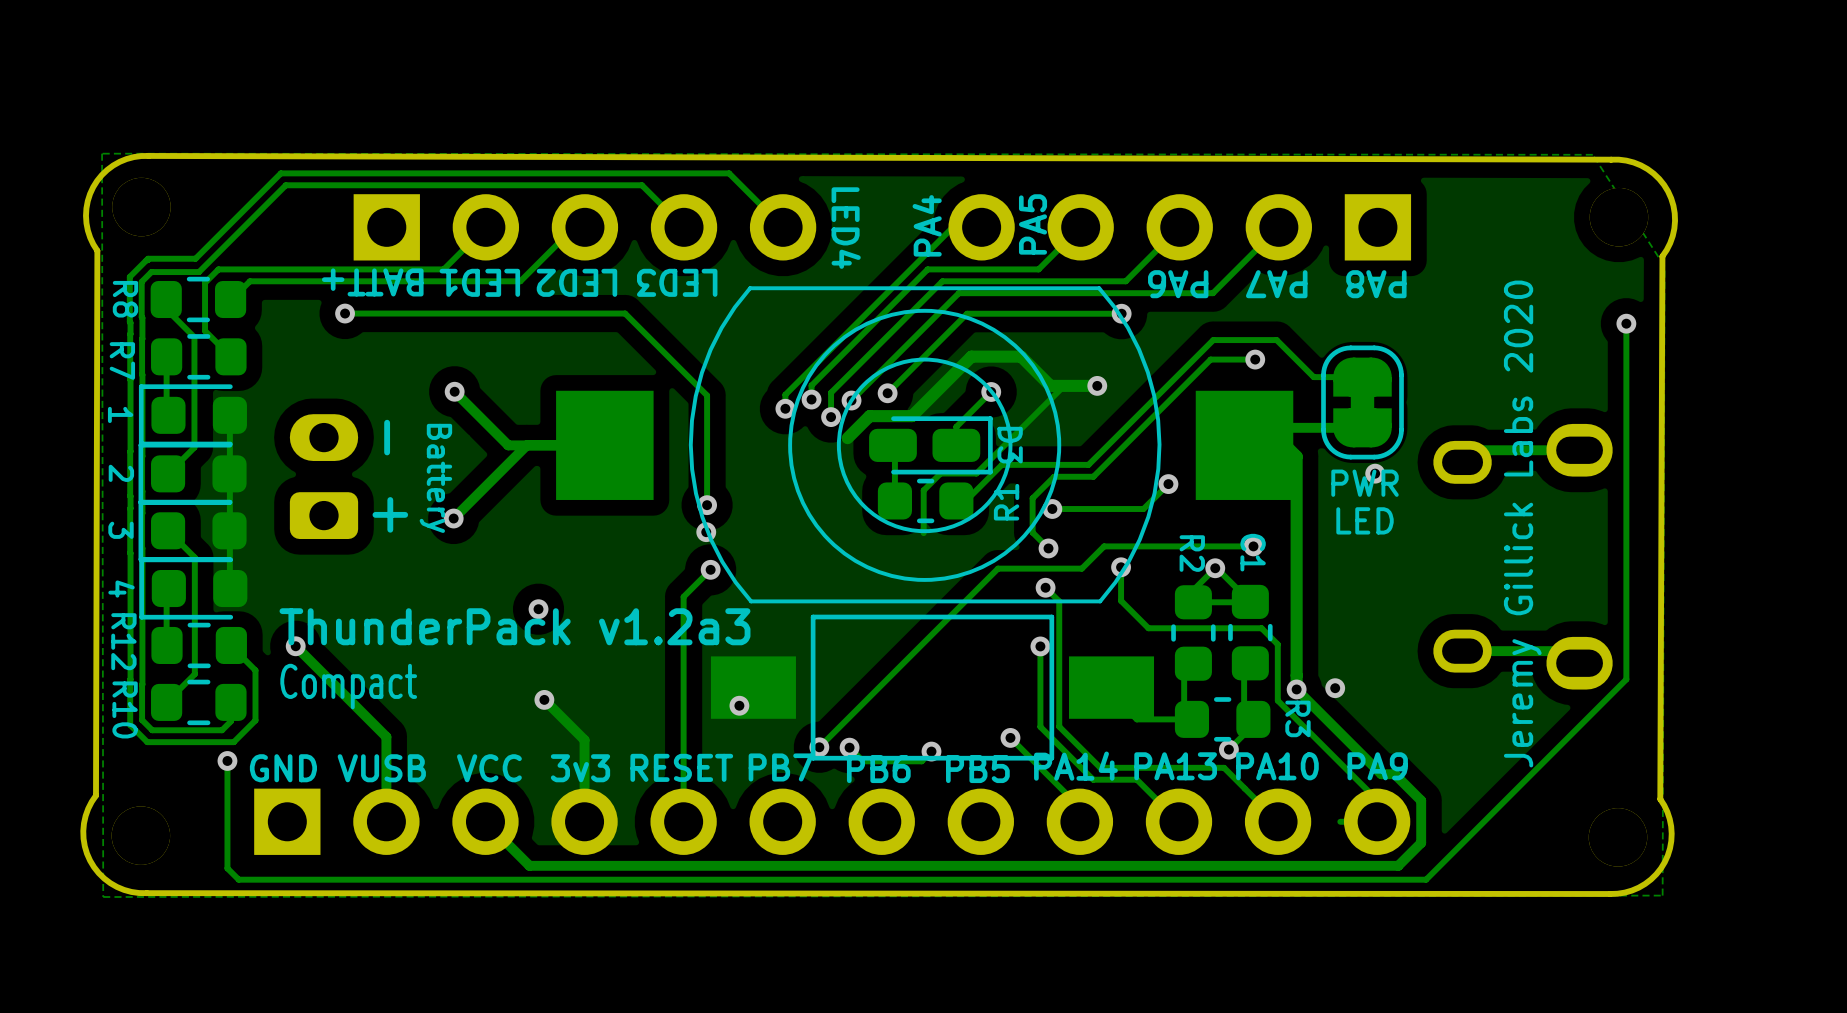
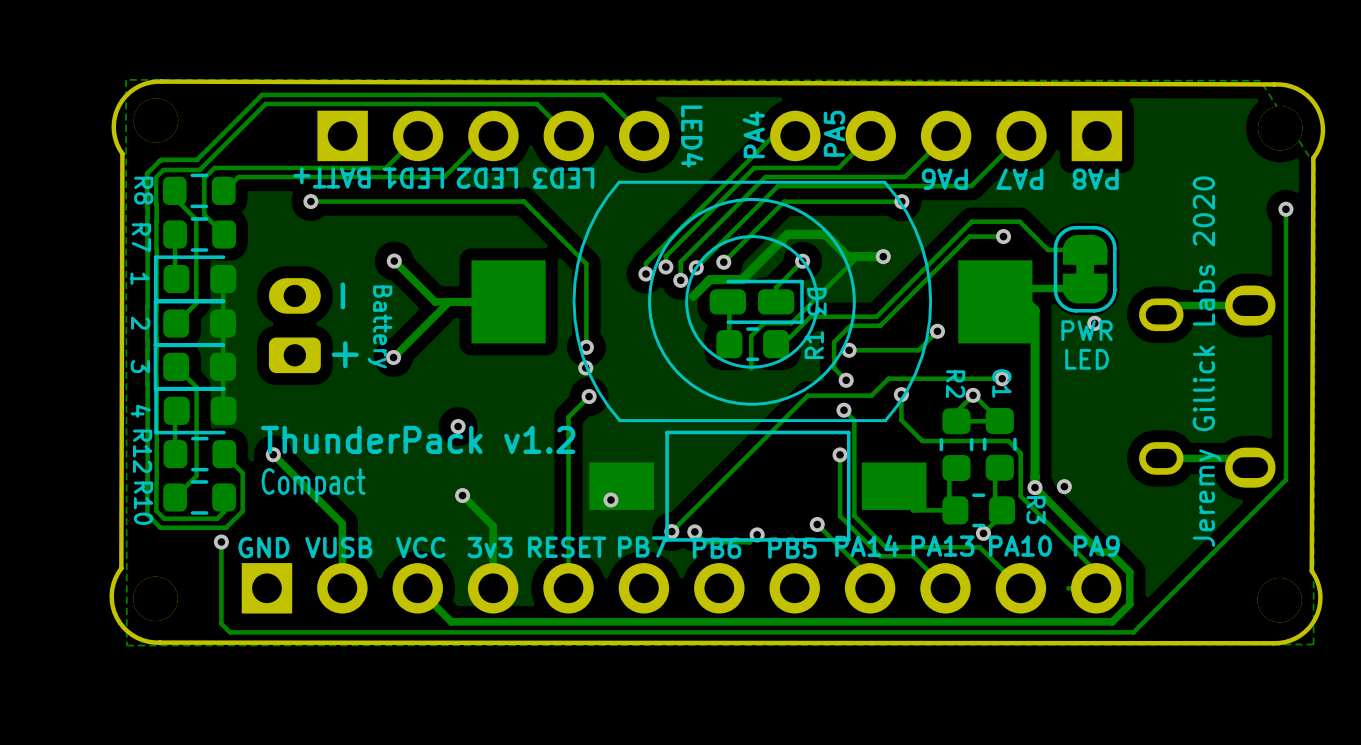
text: ThunderPack v1.2a3 (514, 626) -> ThunderPack v1.2 (418, 439)

